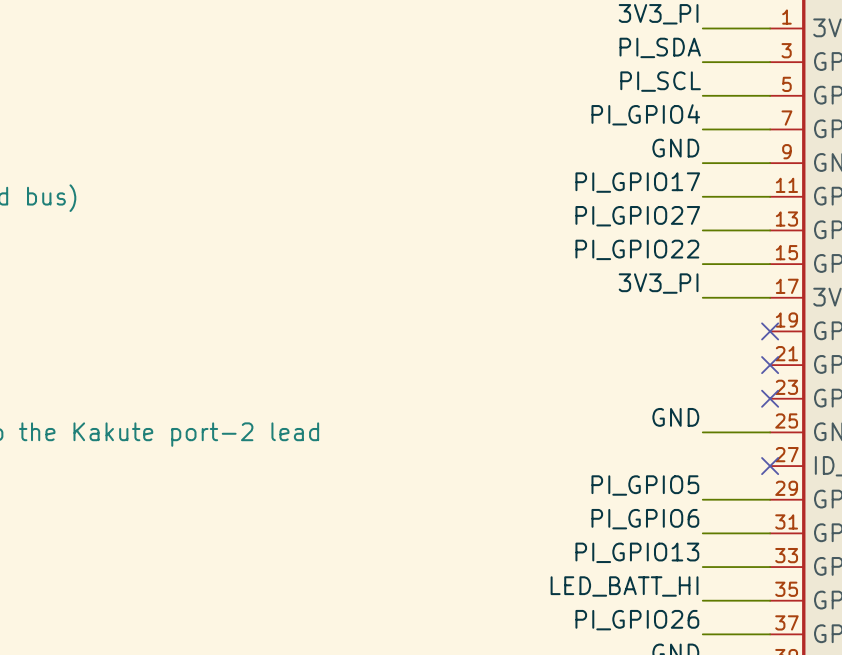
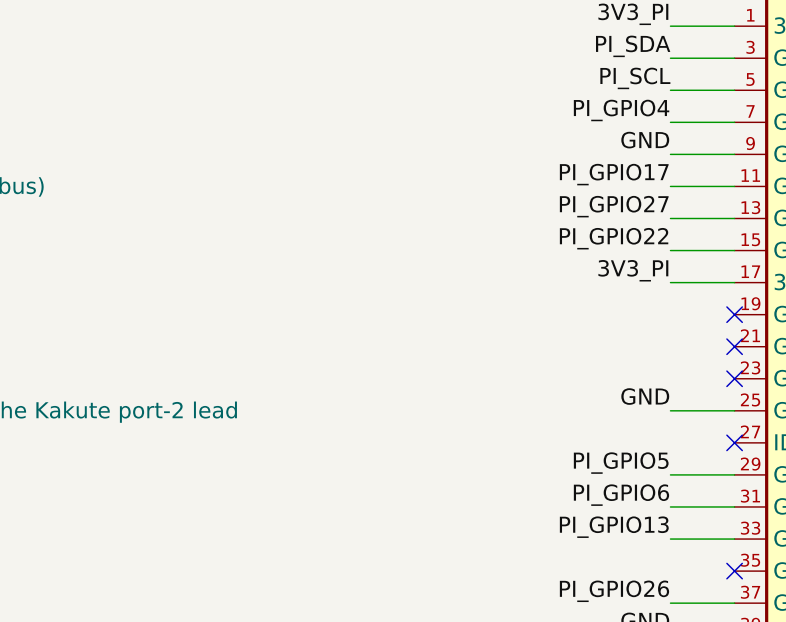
label: LED_BATT_HI (624, 586) -> none
wire: (702, 600) (770, 600) -> none
no-connect mark: none -> (734, 571)

